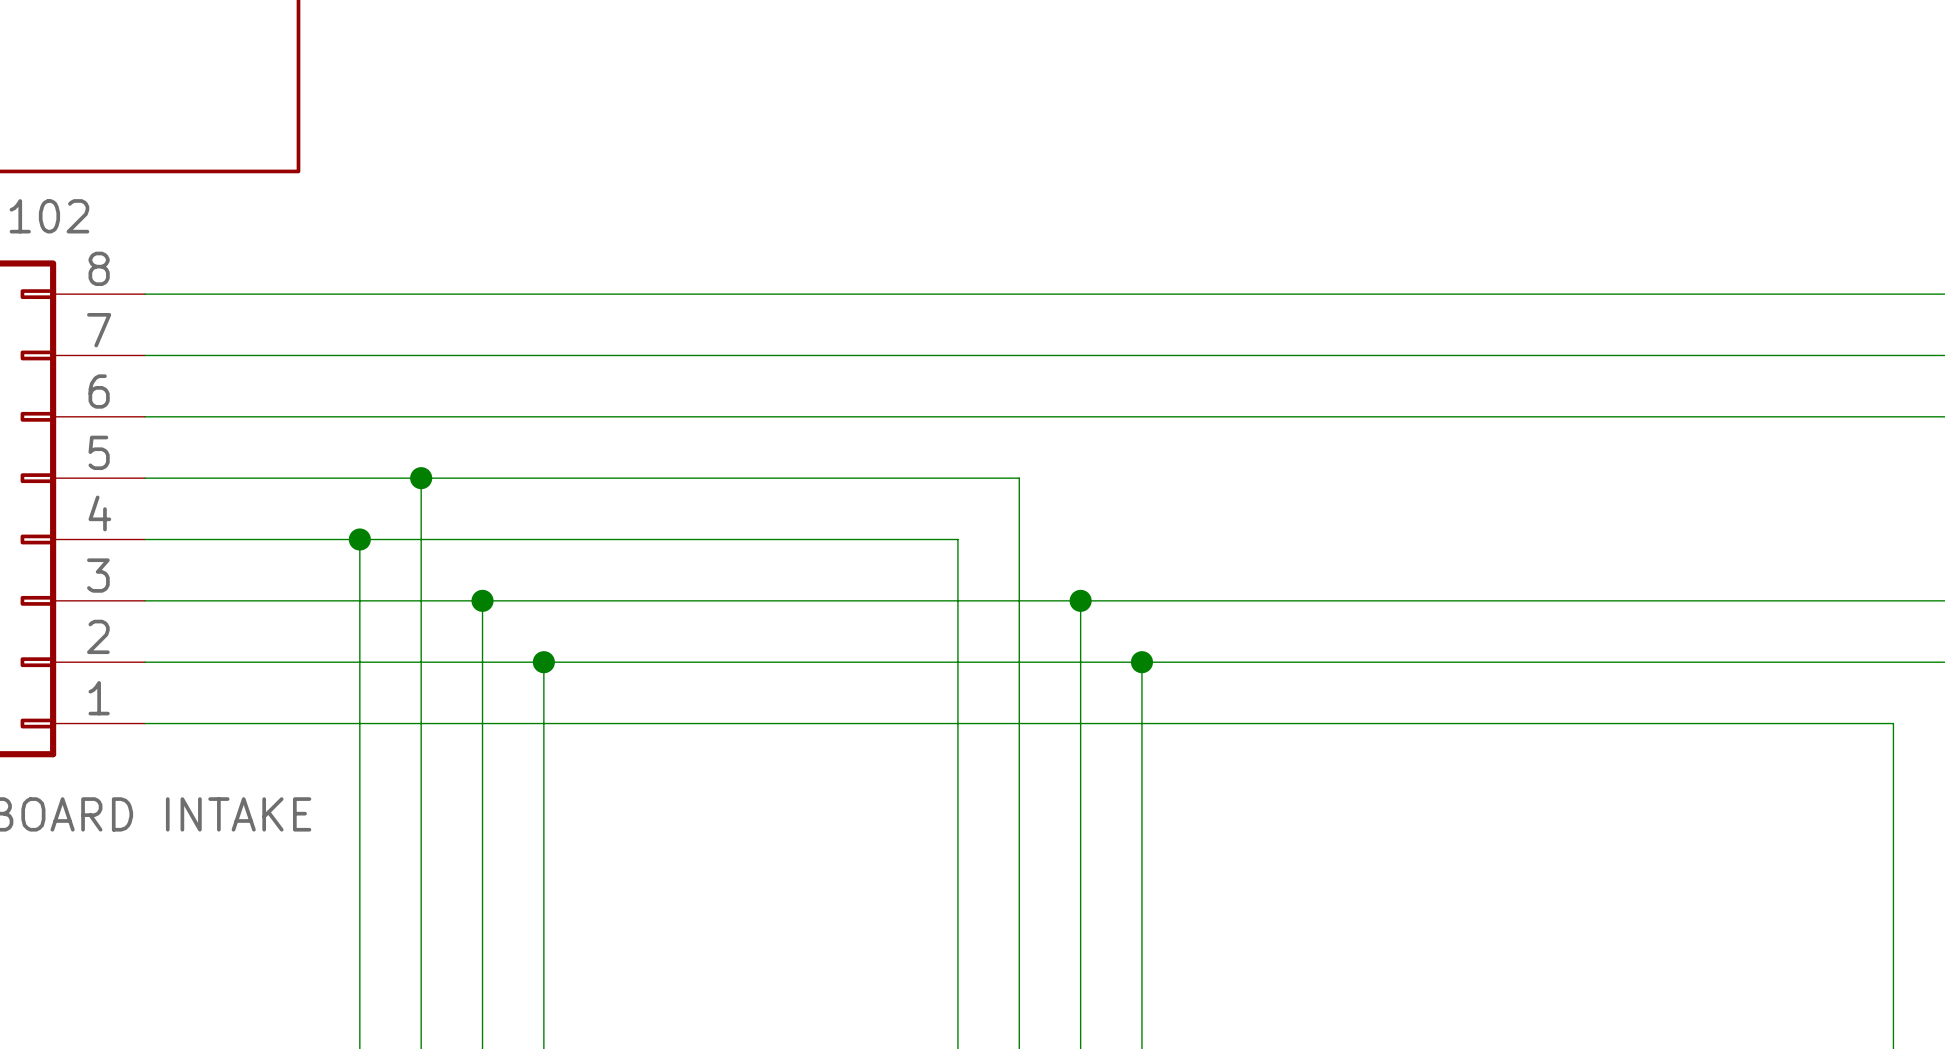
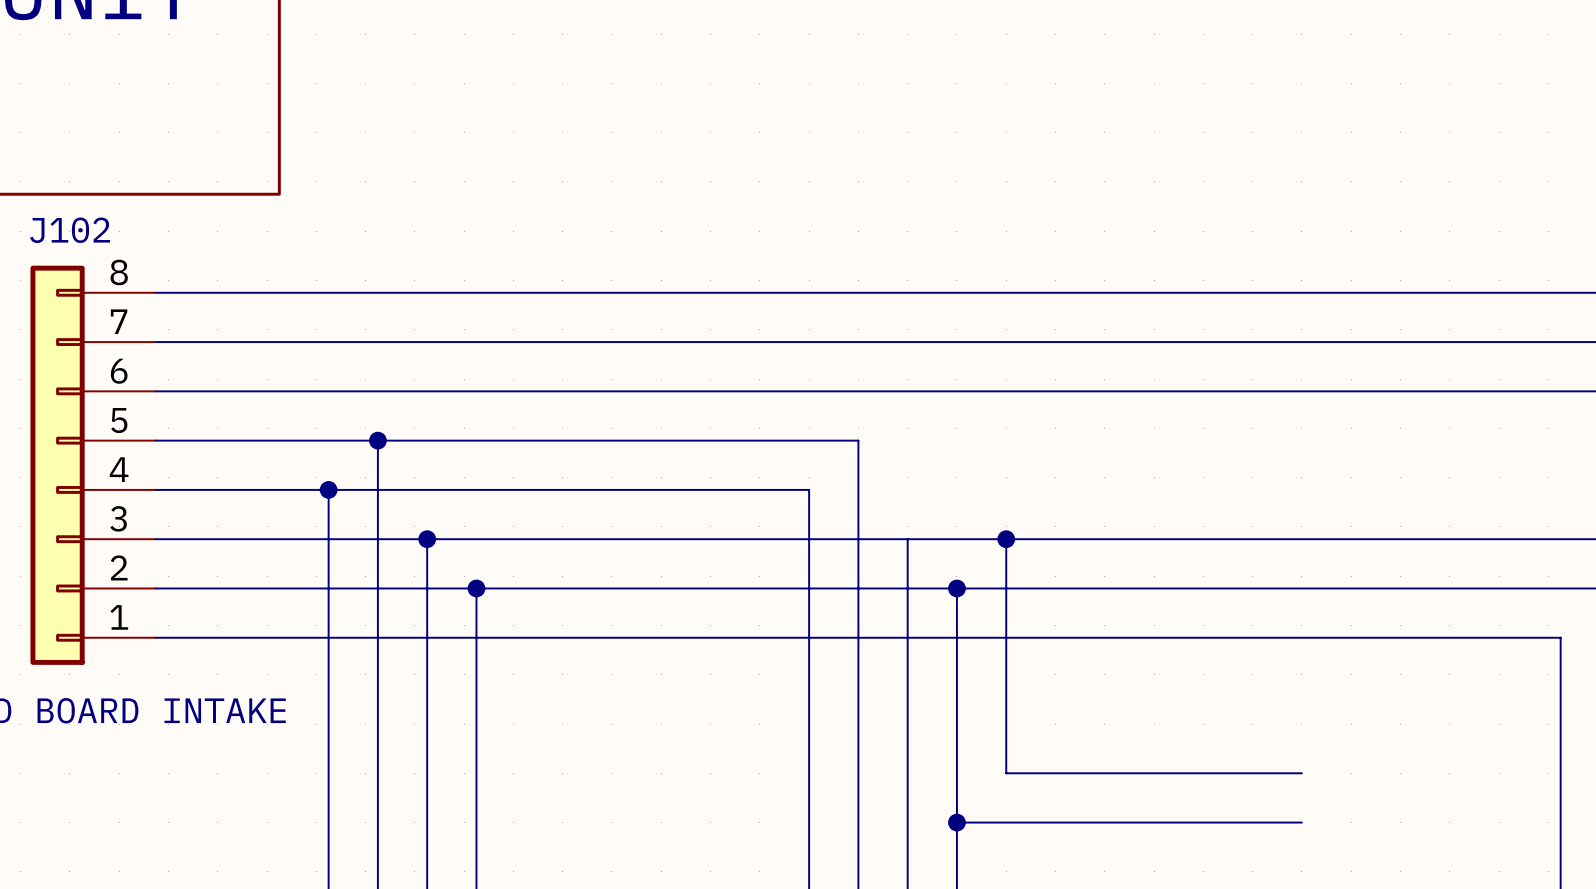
junction position: (1080, 600) -> (1006, 539)
wire: none -> (1006, 539) (1006, 773) (1301, 773)
wire: none -> (956, 822) (1301, 822)
junction: none -> (956, 822)

